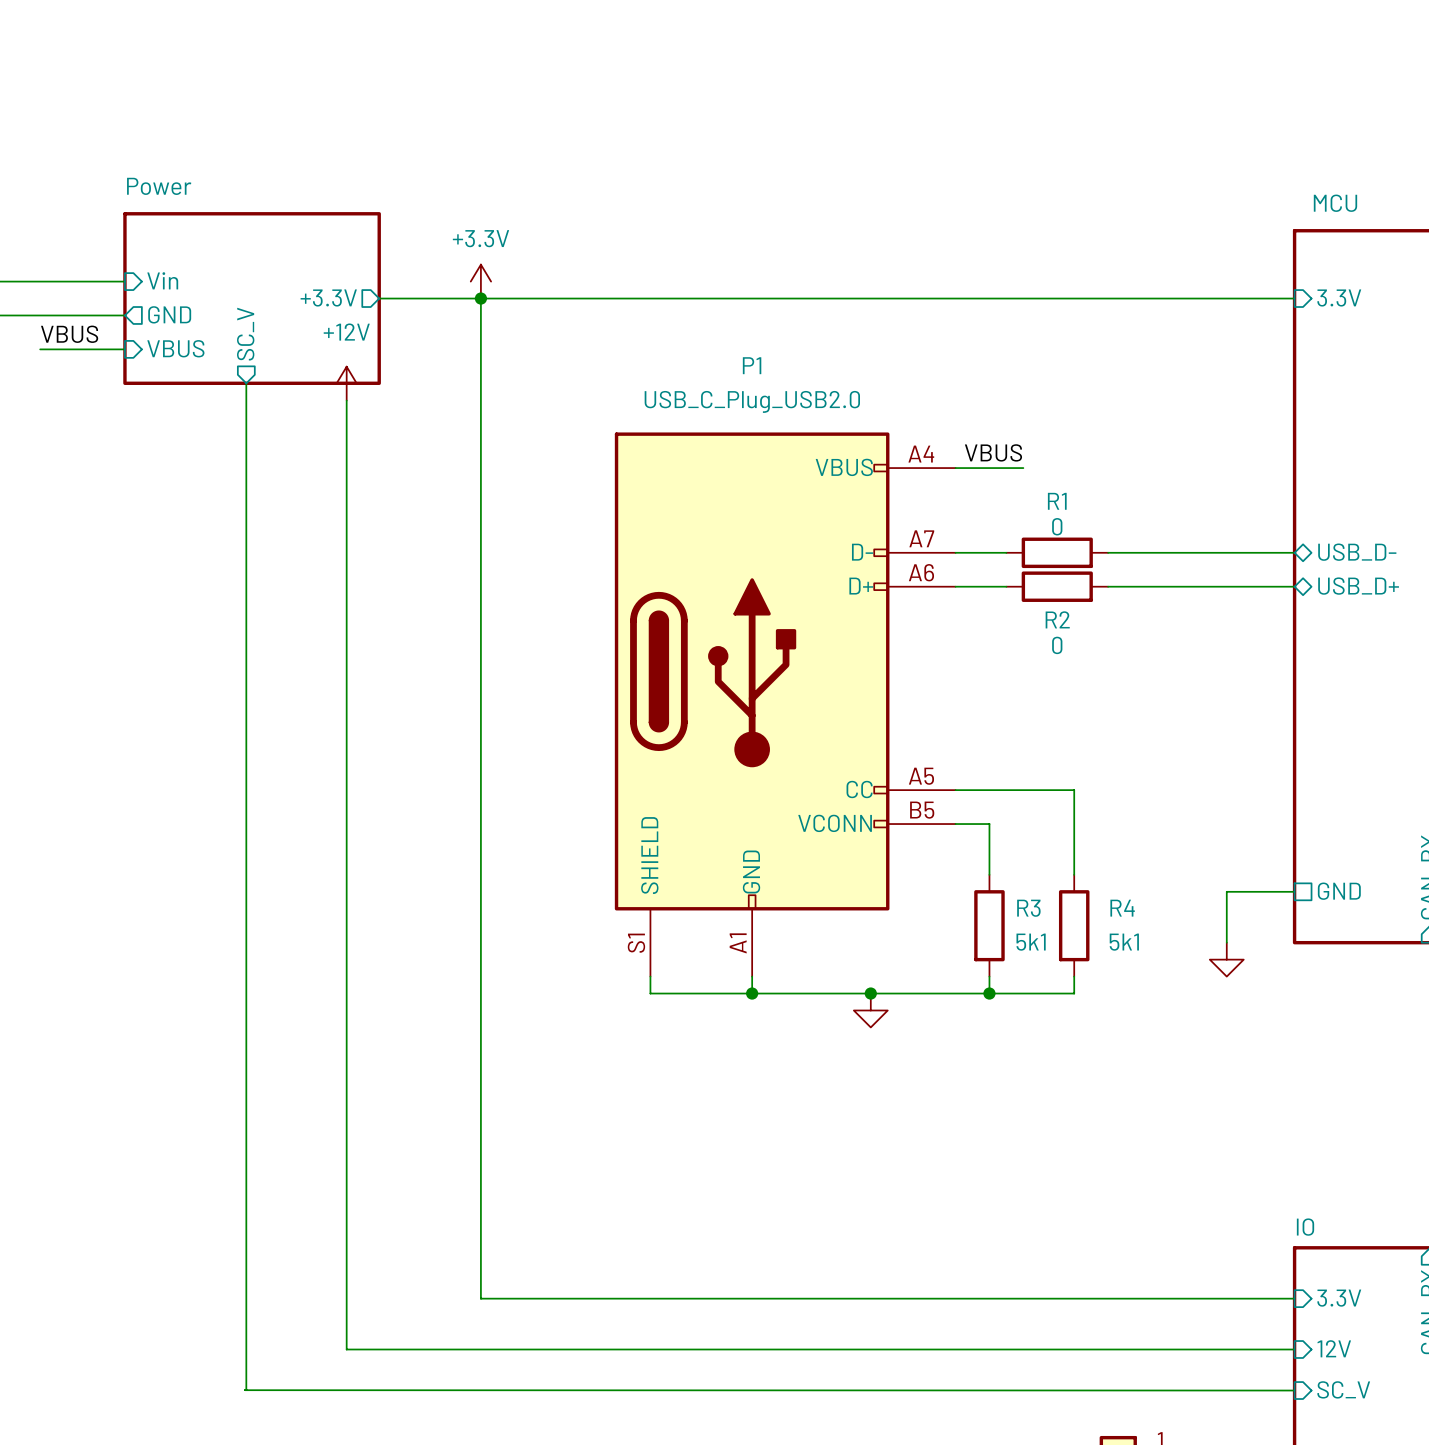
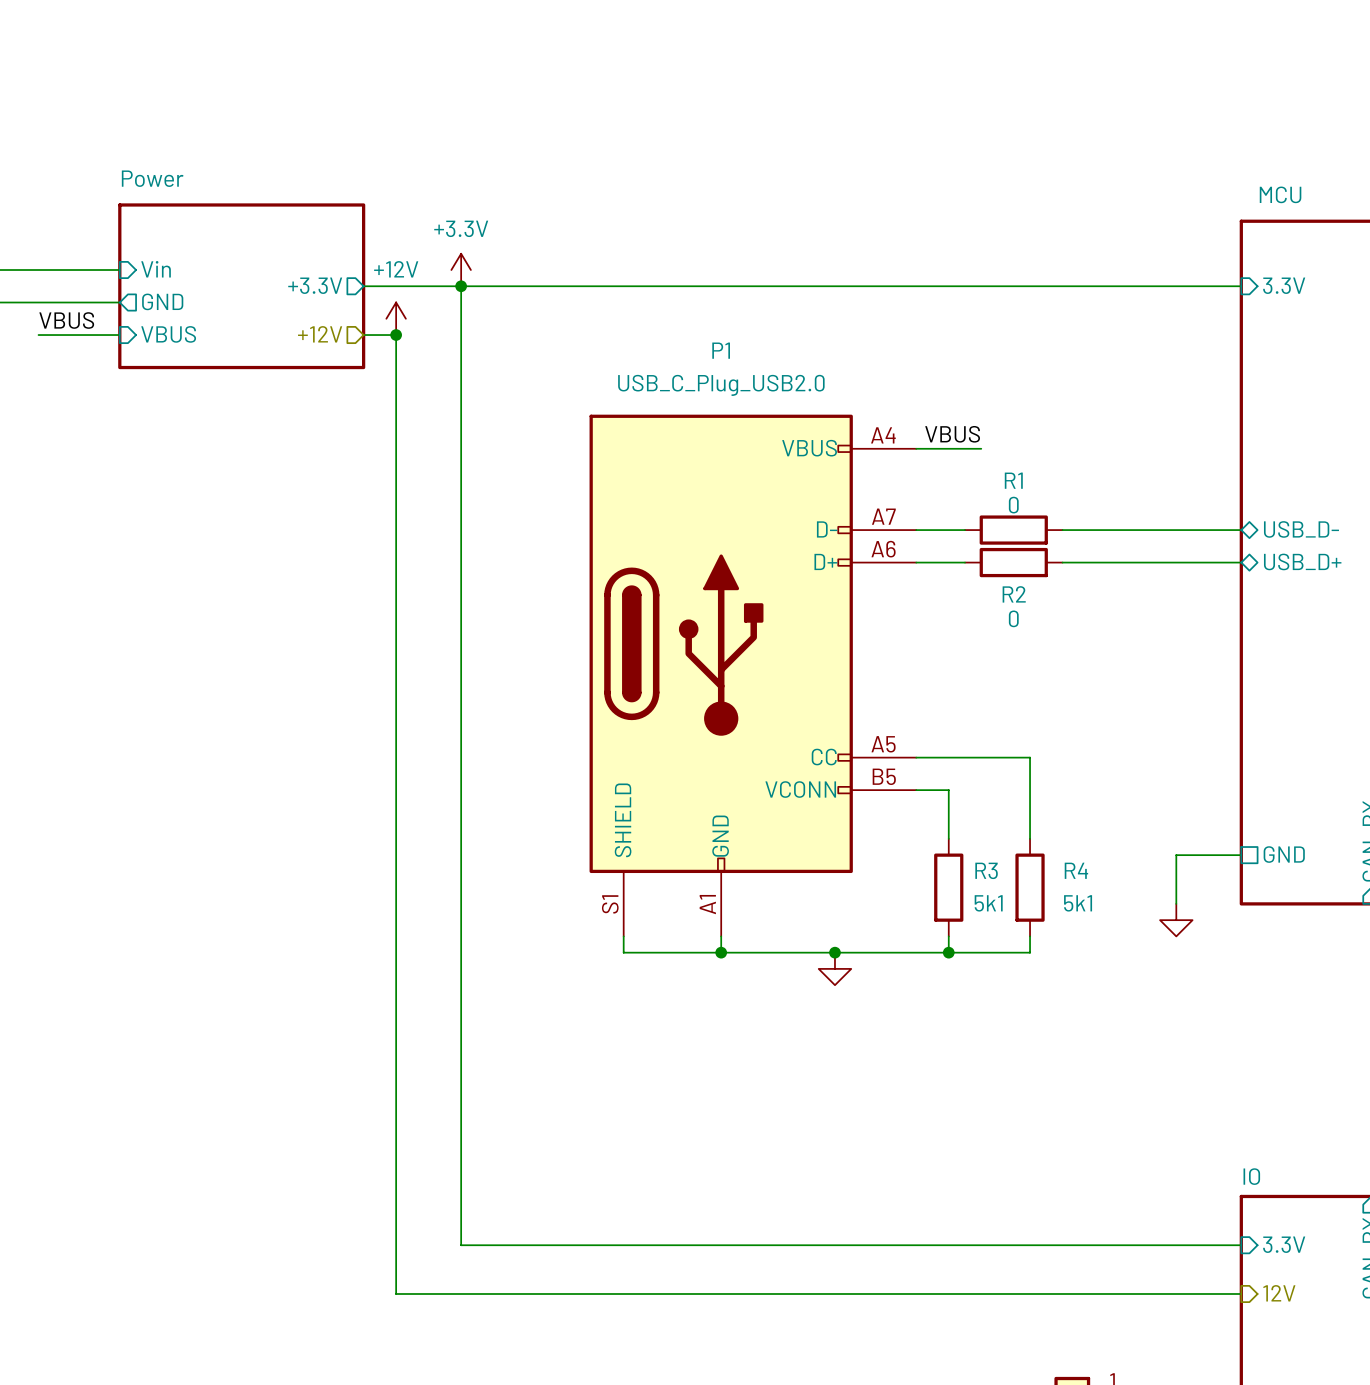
sheet pin: SC_V (245, 334) -> none
hierarchical label: none -> +12V (320, 334)
junction: none -> (396, 335)
wire: (246, 383) (245, 1390) (1294, 1390) -> none
power symbol position: +12V (346, 383) -> +12V (396, 318)
wire: (346, 400) (346, 1349) (413, 1349) -> (363, 335) (396, 335) (396, 1293)
sheet pin: 12V (1334, 1348) -> none
hierarchical label: none -> 12V (1279, 1293)
sheet pin: SC_V (1343, 1389) -> none

